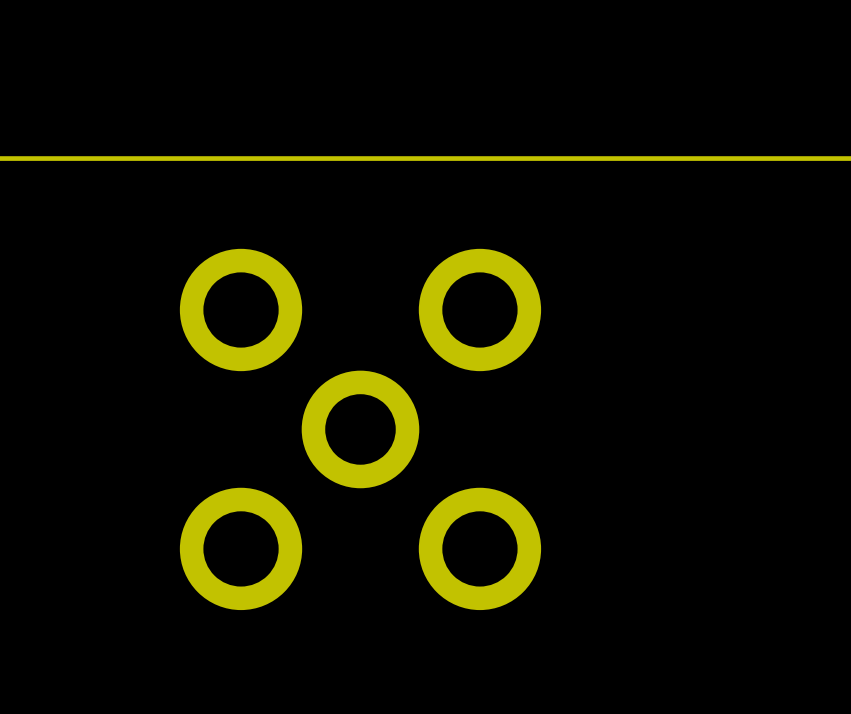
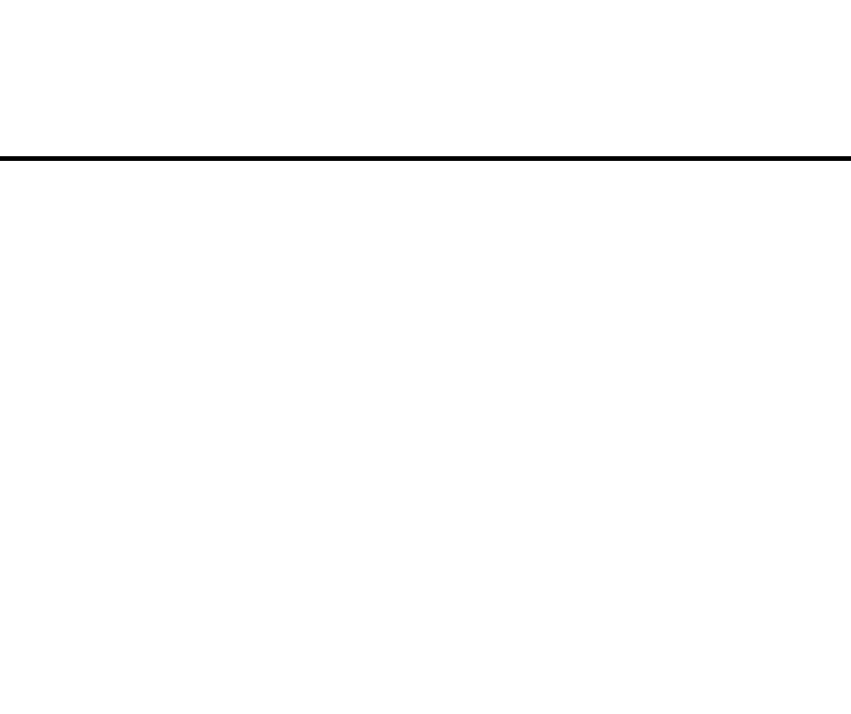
part: (360, 429) -> none

